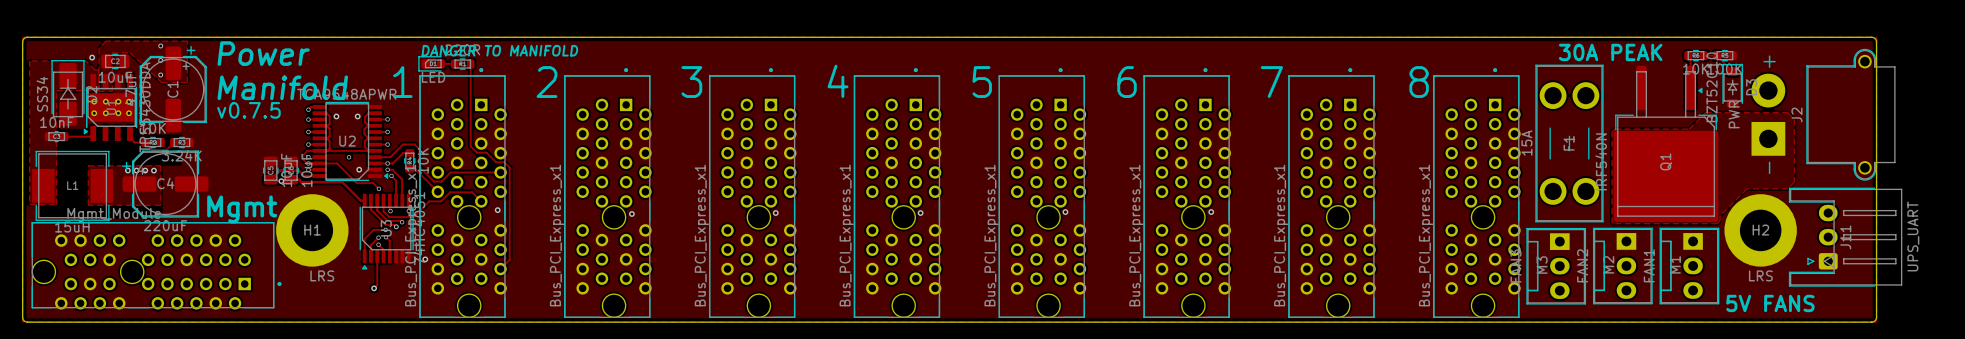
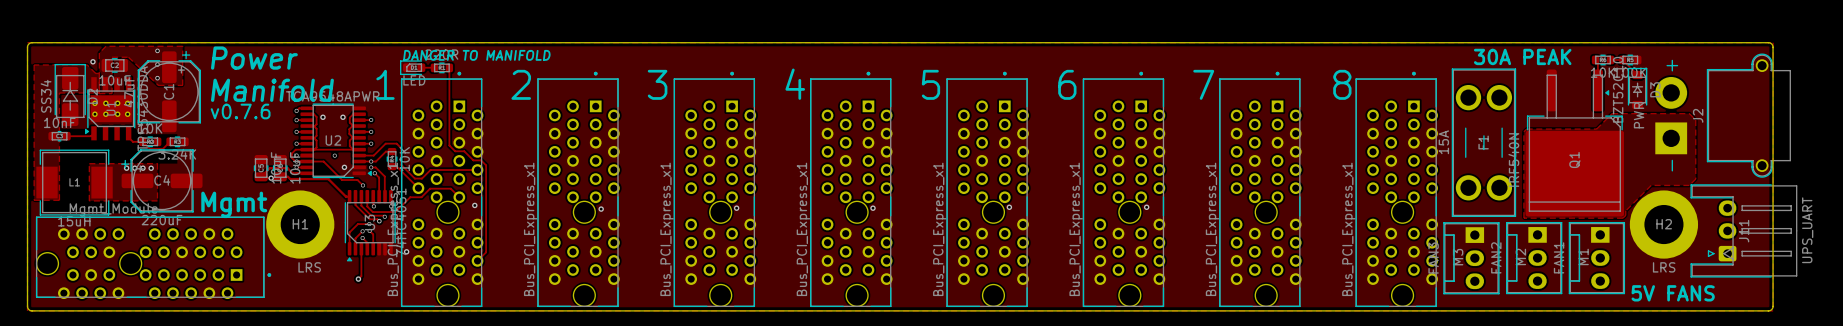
text: v0.7.5 (248, 110) -> v0.7.6 (240, 111)

